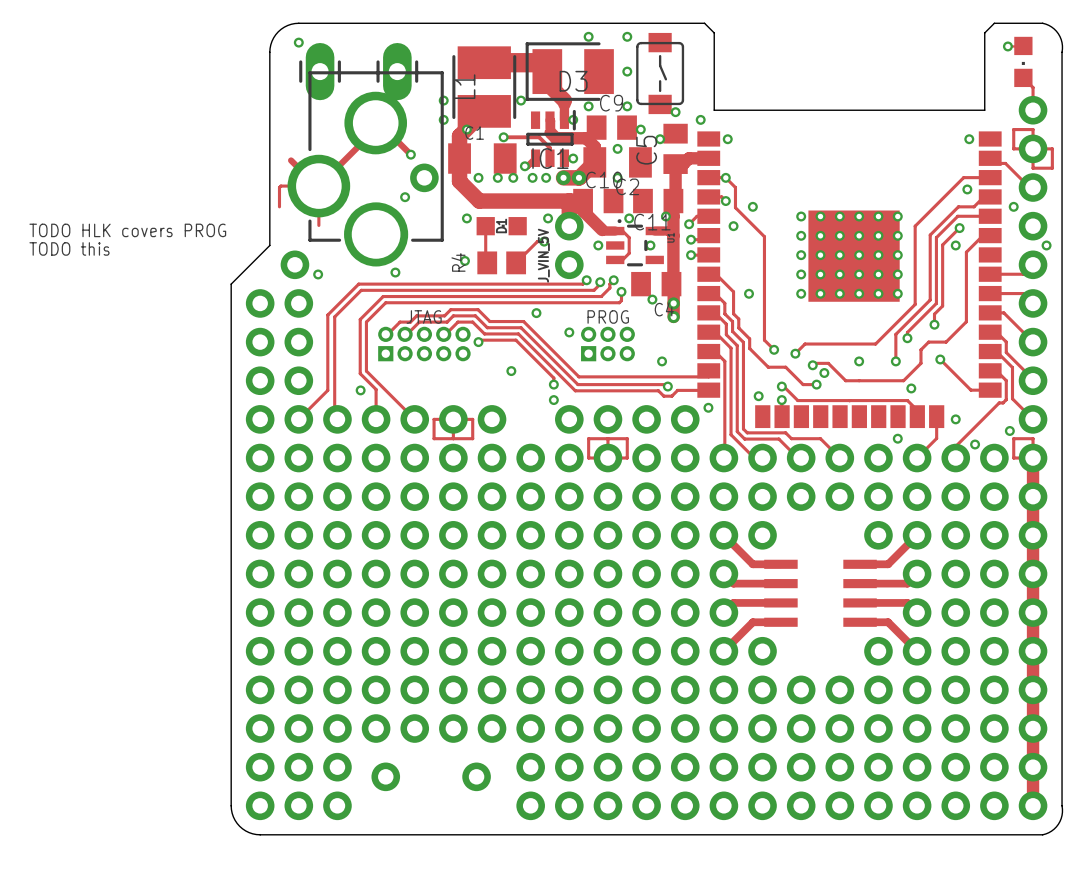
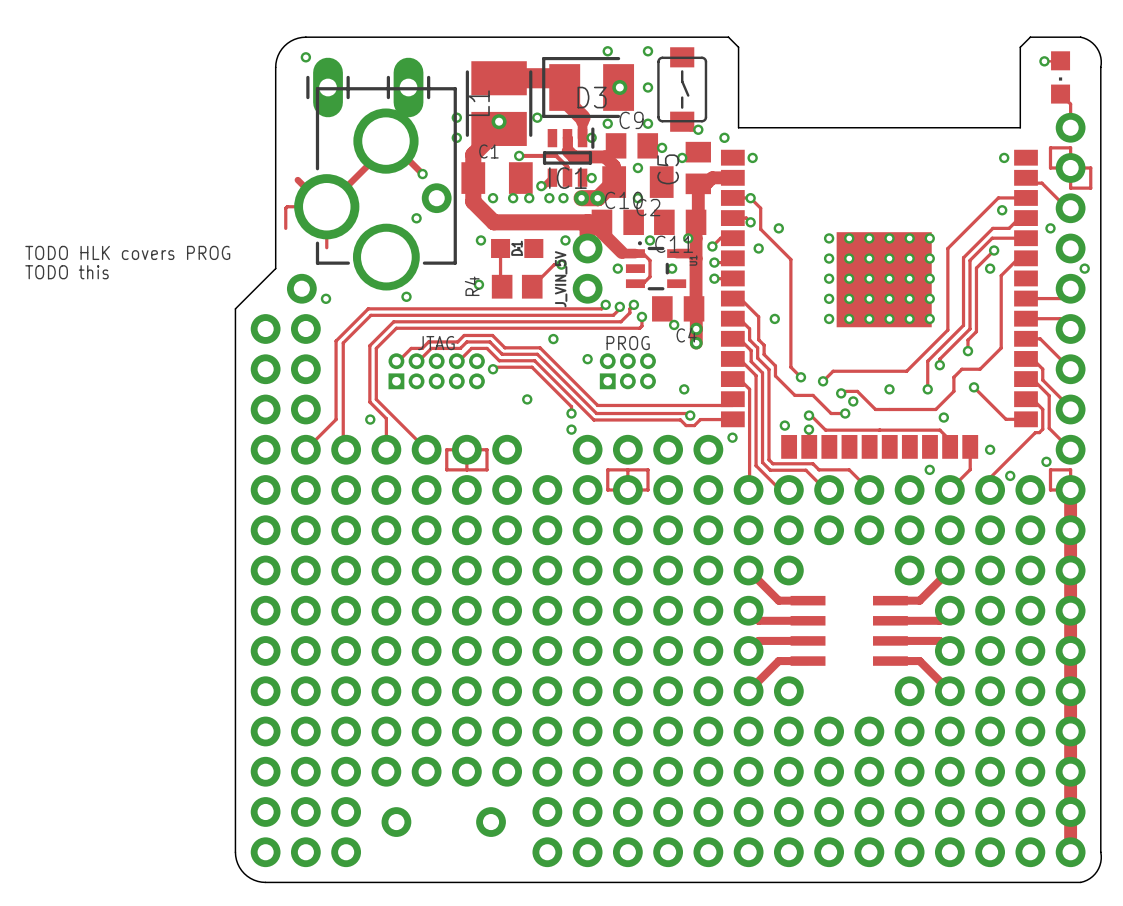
via: none -> (619, 87)
via: none -> (499, 121)
via: (466, 129) -> none

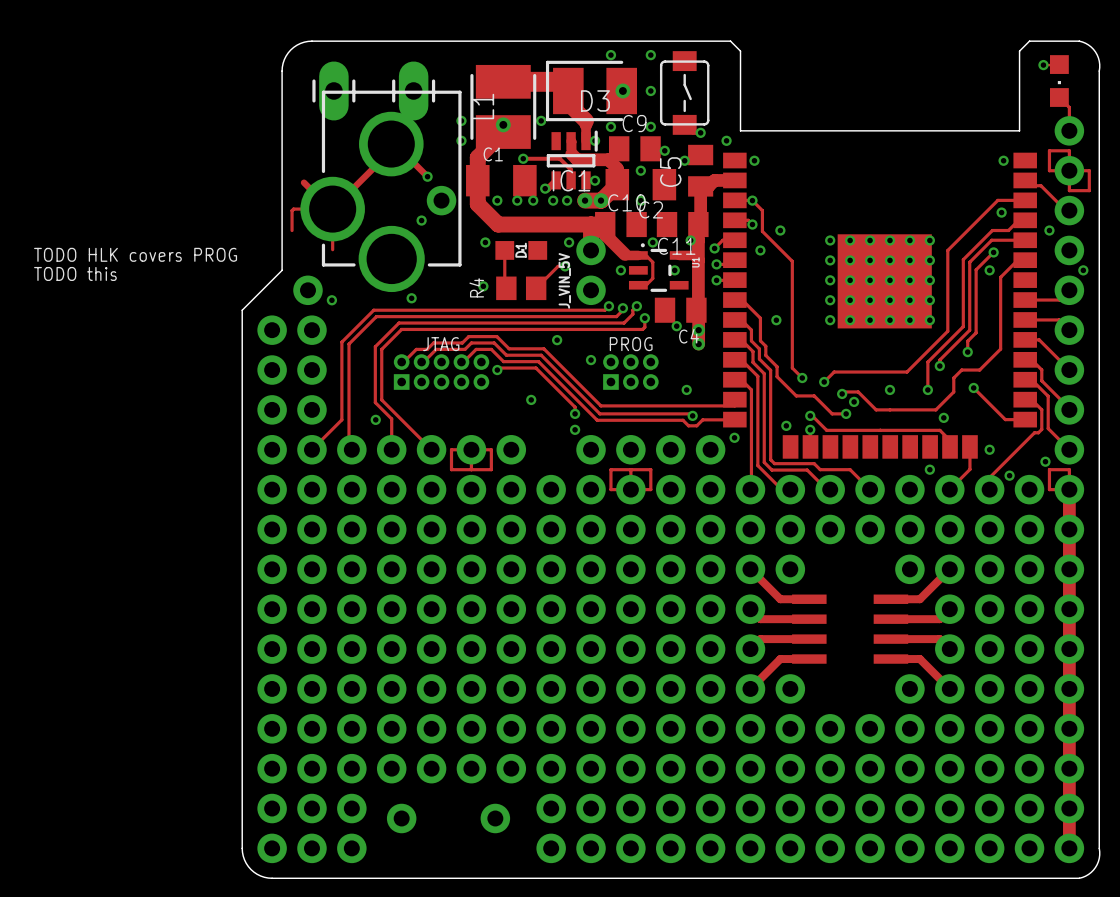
via: (305, 57) -> none

